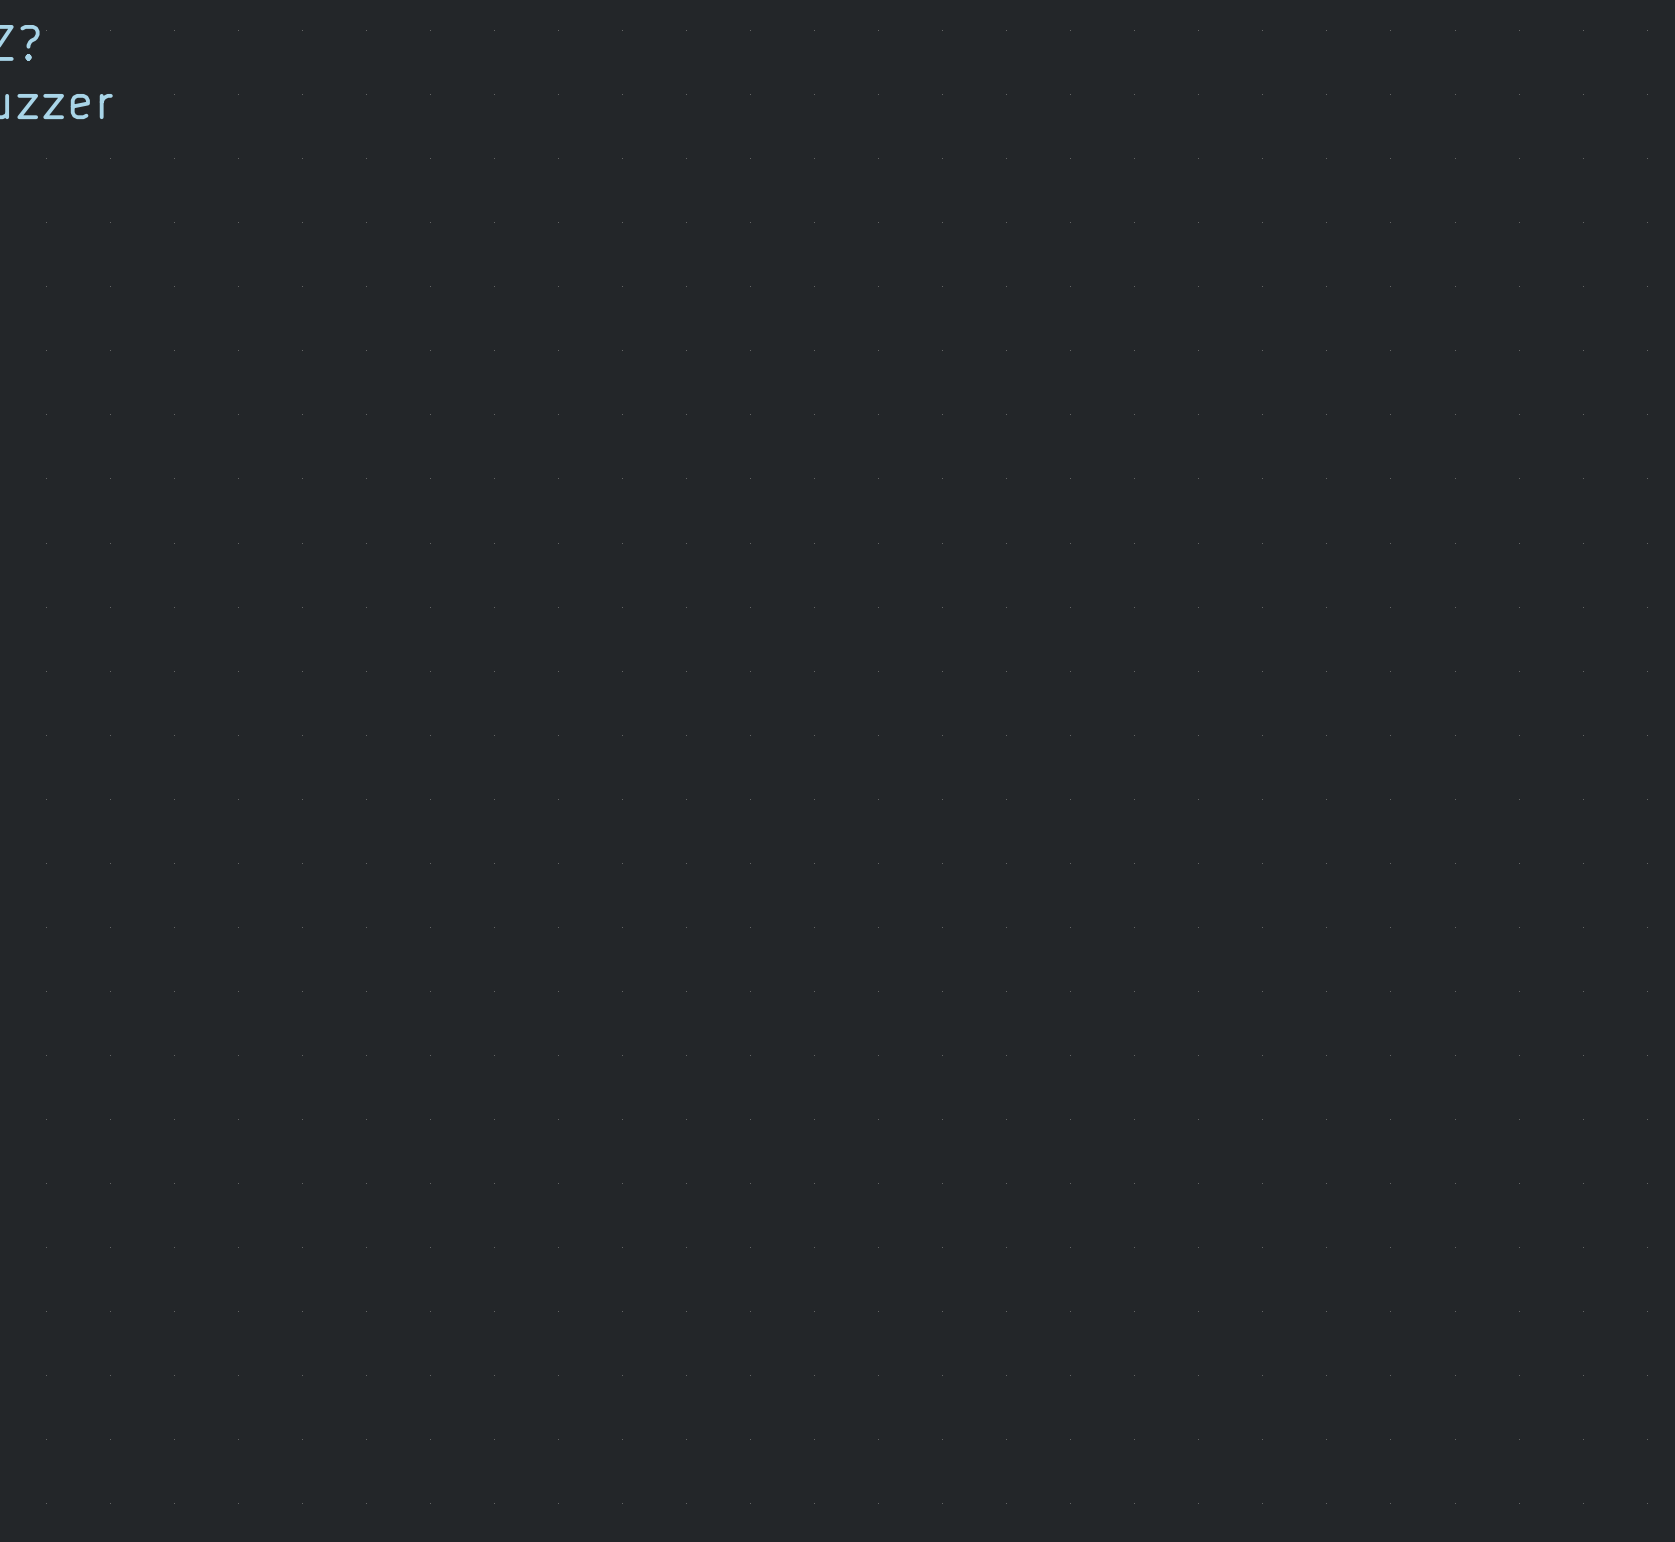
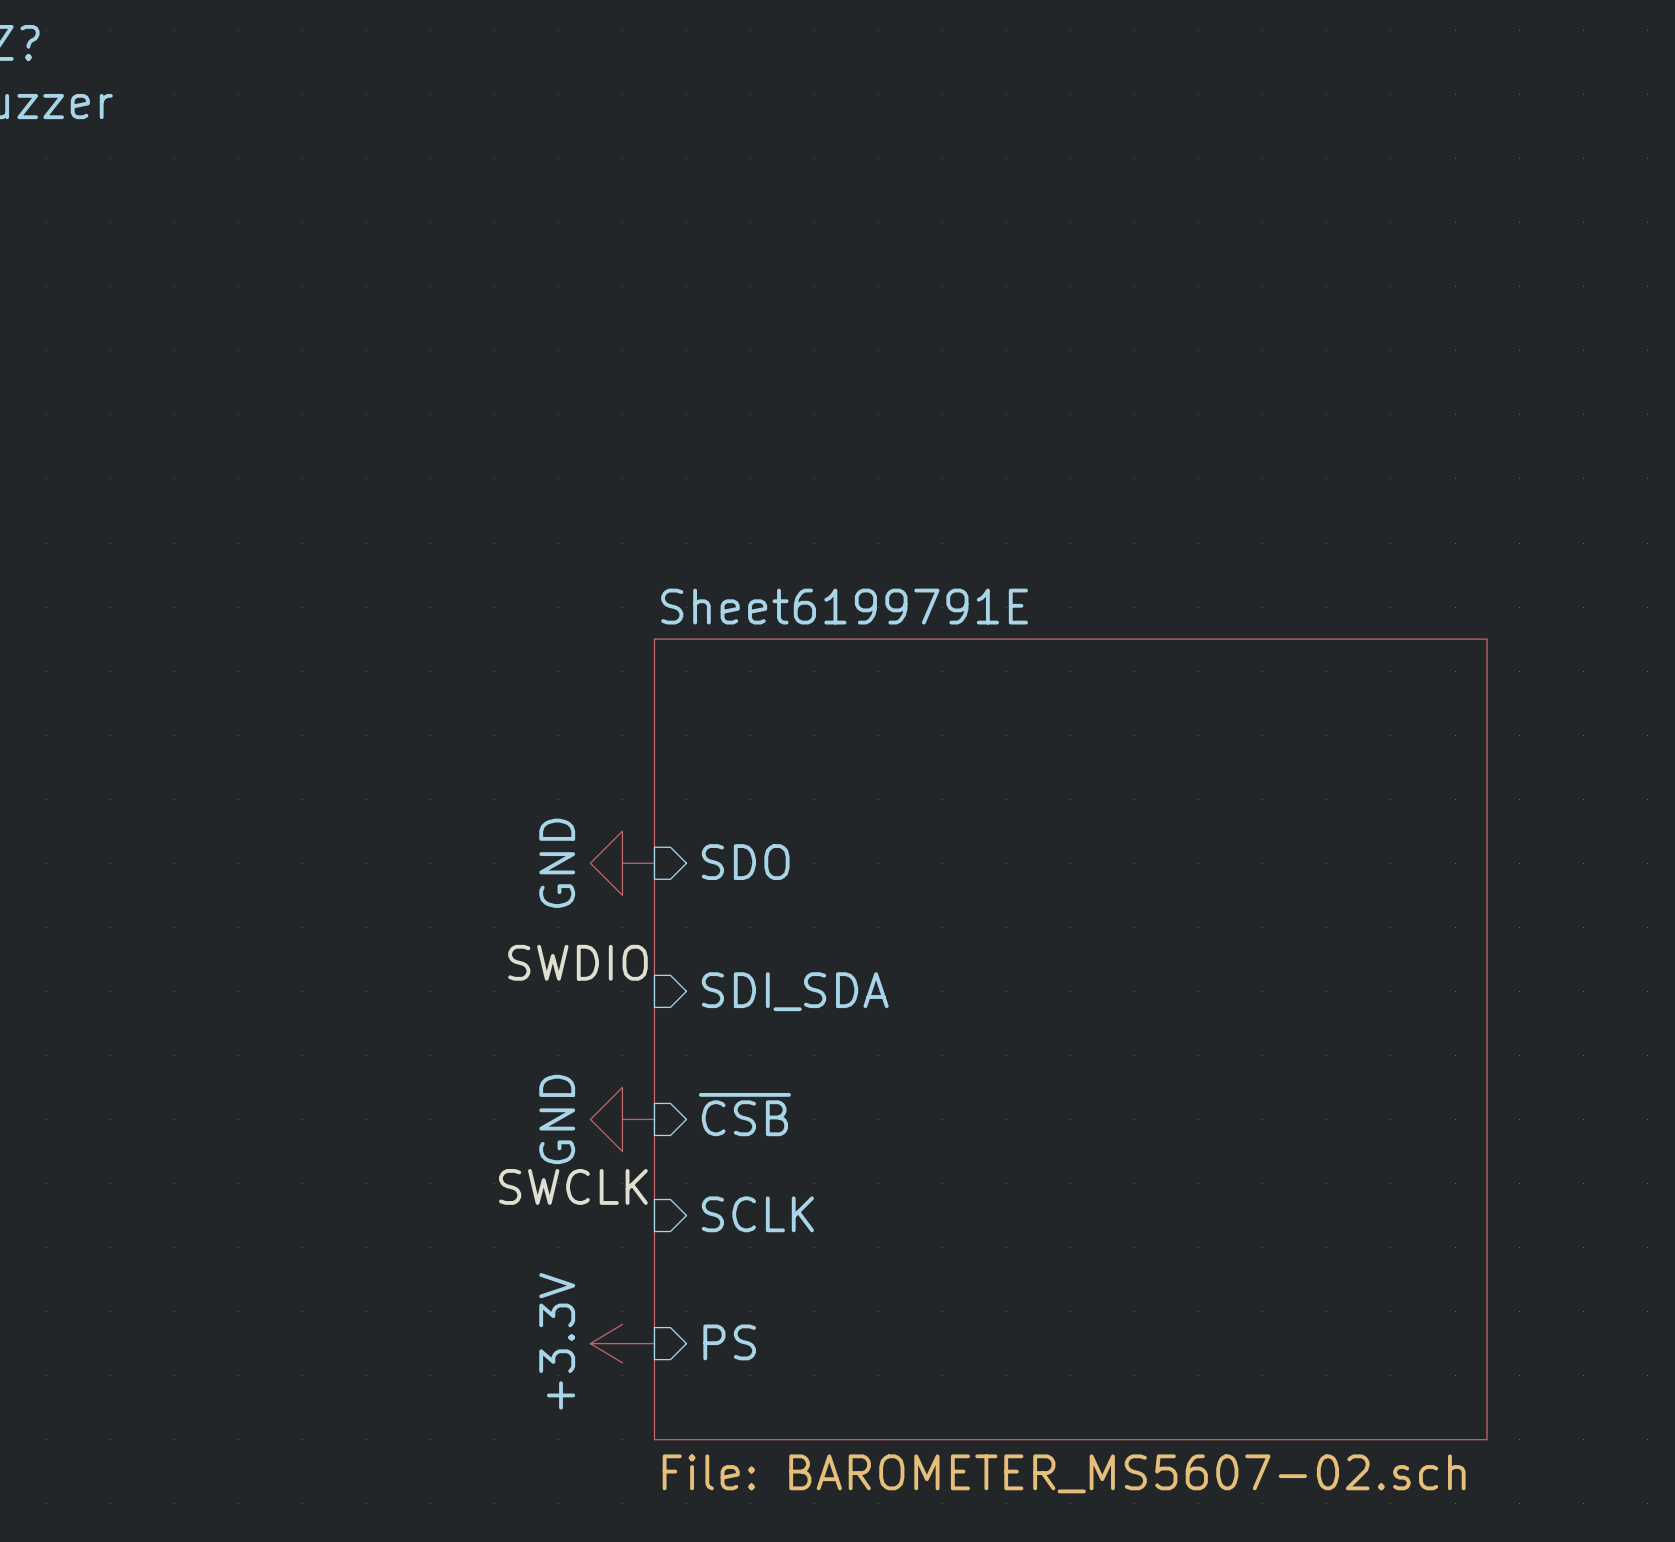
sheet pin: none -> SDO (745, 862)
power symbol: none -> GND (622, 863)
label: none -> SWDIO (577, 962)
sheet pin: none -> SDI_SDA (795, 991)
sheet Sheet6199791E: none -> File: BAROMETER_MS5607-02.sch (1070, 1039)
sheet pin: none -> ~{CSB} (744, 1114)
power symbol: none -> GND (622, 1119)
label: none -> SWCLK (573, 1186)
sheet pin: none -> SCLK (757, 1214)
sheet pin: none -> PS (729, 1342)
power symbol: none -> +3.3V (622, 1343)

